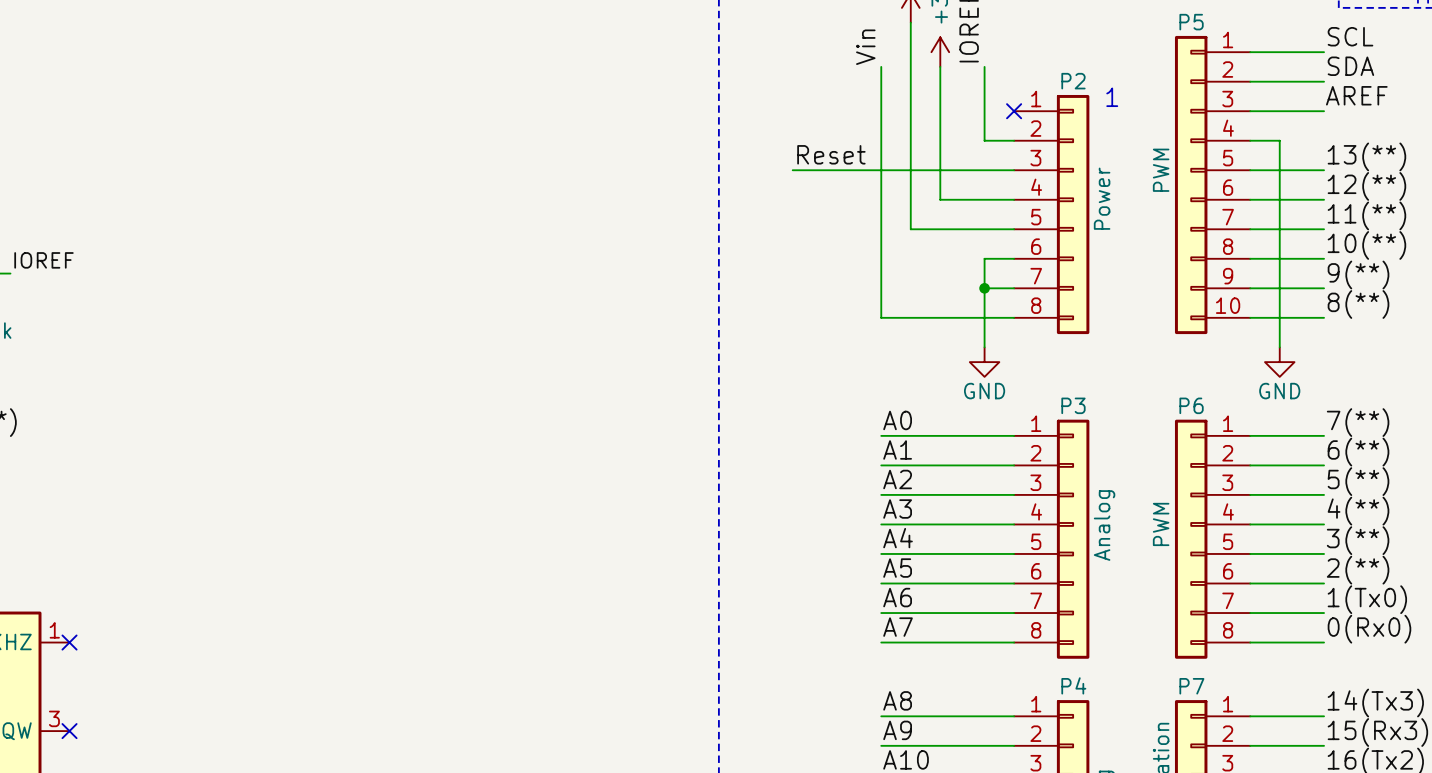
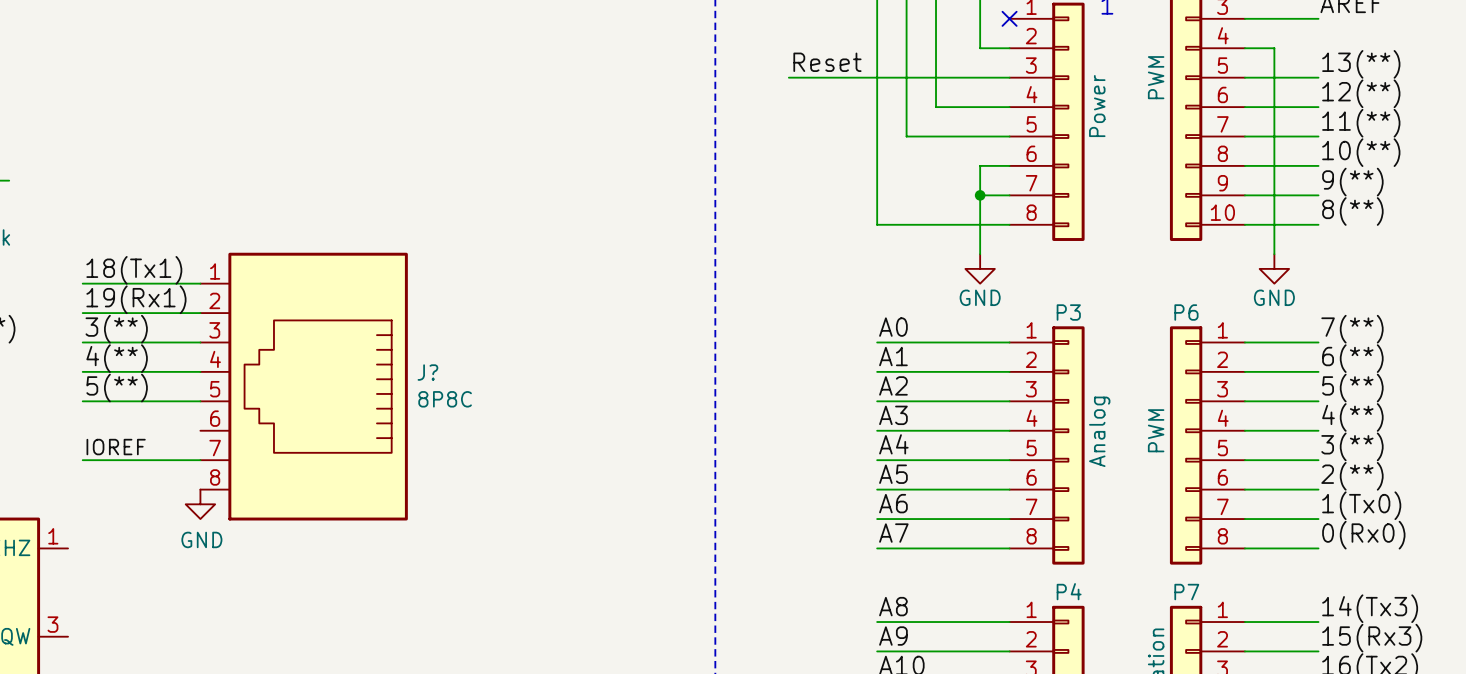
label: IOREF (43, 260) -> none
label: none -> 18(Tx1) (134, 270)
wire: none -> (82, 283) (200, 283)
label: none -> 19(Rx1) (136, 299)
wire: none -> (82, 313) (200, 313)
label: none -> 3(**) (116, 329)
wire: none -> (82, 342) (200, 342)
label: none -> 4(**) (117, 358)
wire: none -> (82, 371) (200, 371)
J?: none -> 8P8C (304, 386)
label: none -> 5(**) (117, 388)
wire: none -> (82, 401) (200, 401)
label: none -> IOREF (116, 447)
wire: none -> (82, 460) (200, 460)
power symbol: none -> GND (200, 504)
no-connect mark: (69, 642) -> none
no-connect mark: (69, 731) -> none

